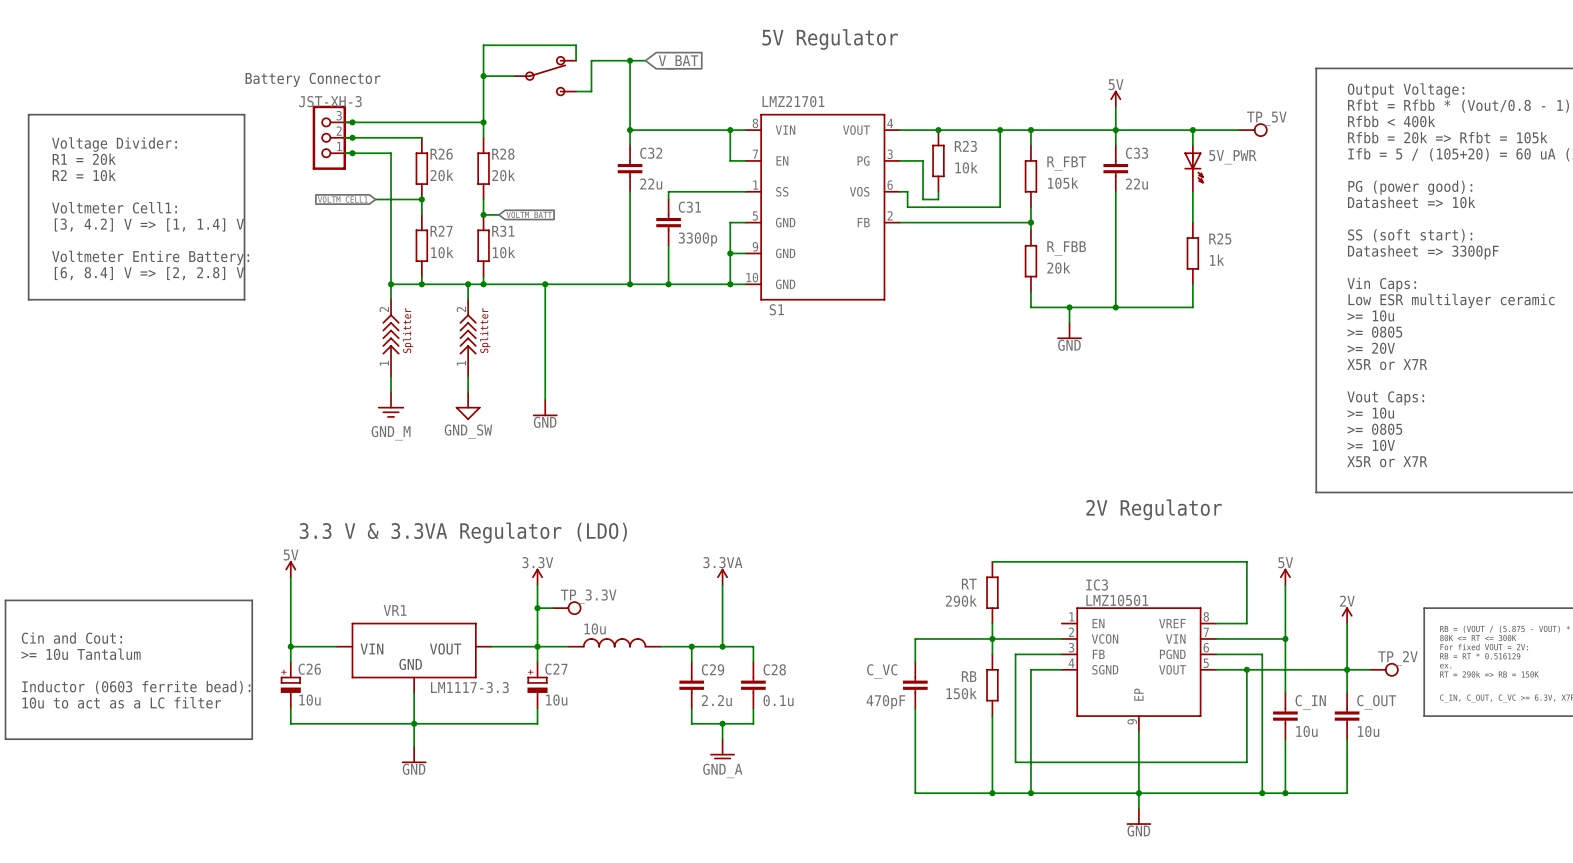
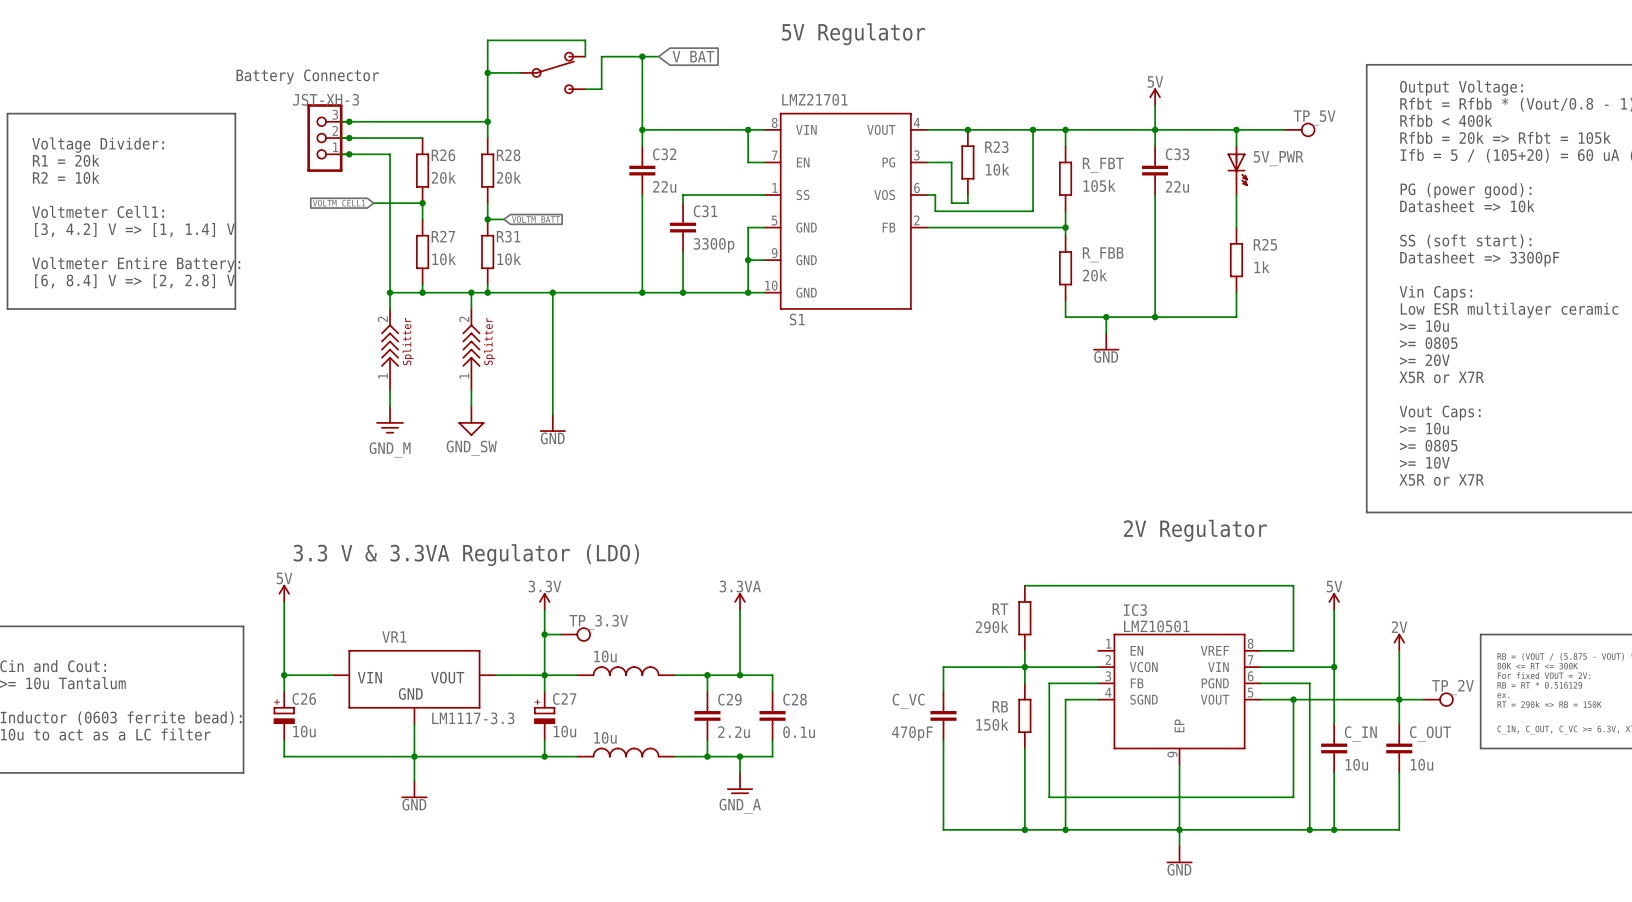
part: none -> 10u (626, 752)
wire: none -> (544, 756) (577, 756)
junction: none -> (544, 756)
wire: none -> (674, 756) (707, 756)
junction: none -> (707, 756)

